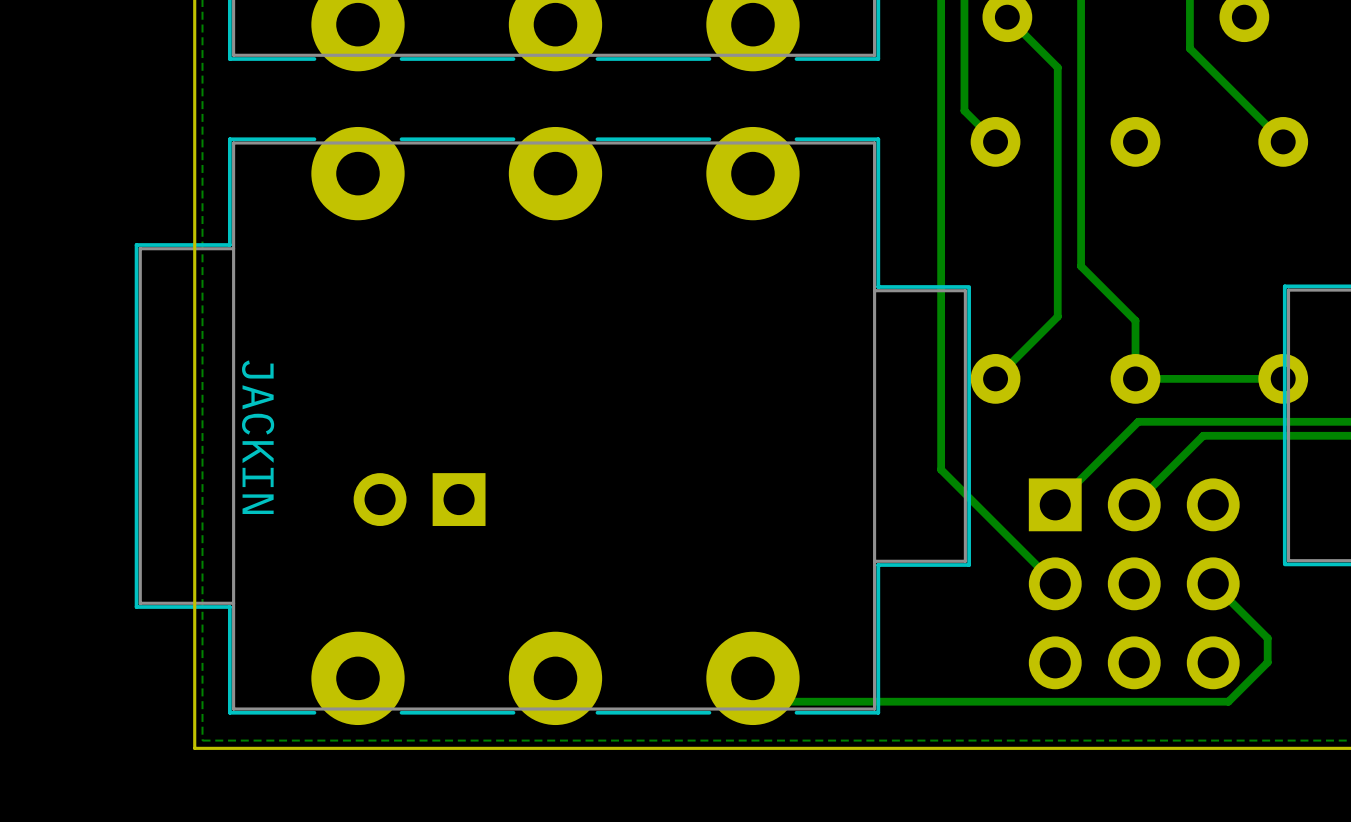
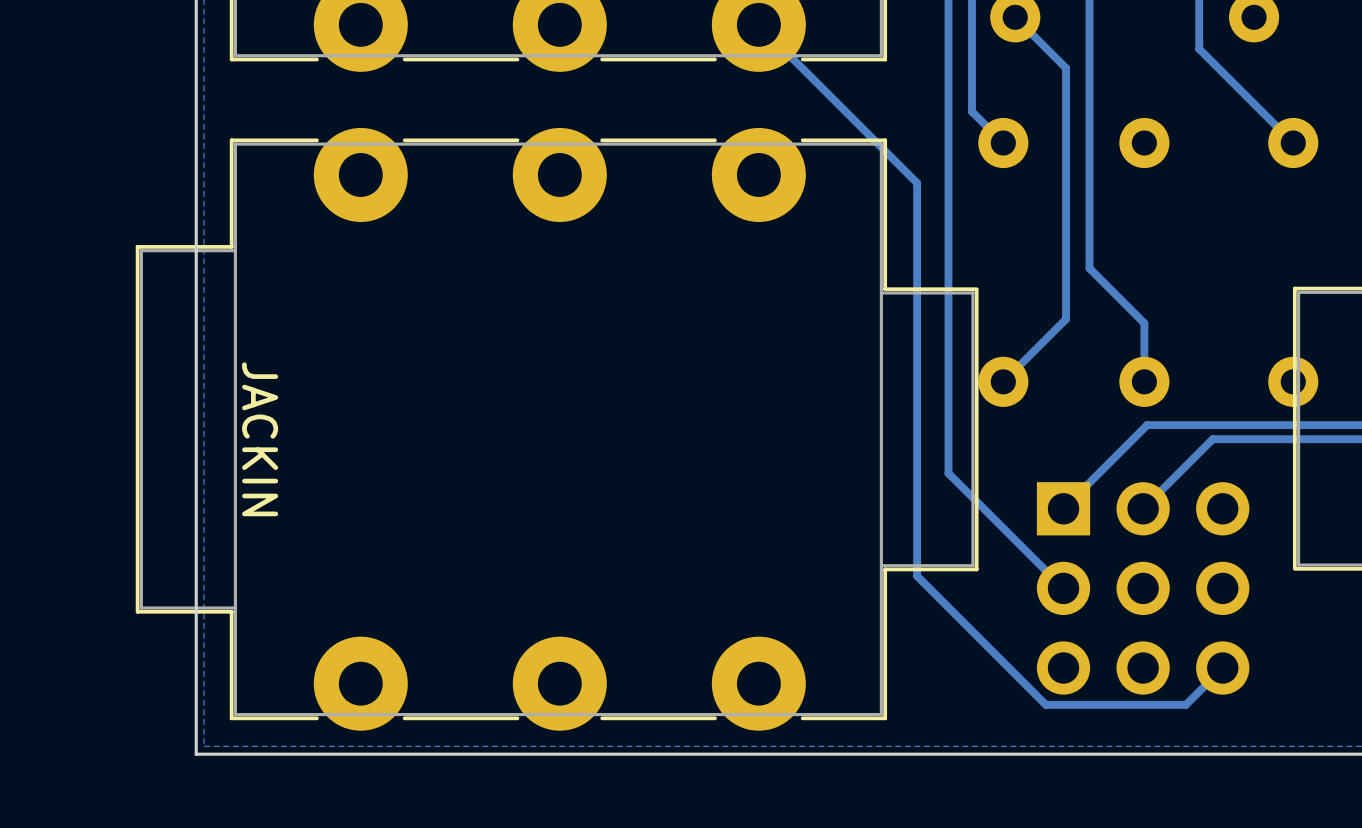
track: none -> (758, 24) (917, 183) (917, 576) (1045, 704) (1185, 704) (1222, 668)
track: (1283, 378) (1135, 378) -> none
part: (419, 499) -> none
track: (1213, 583) (1267, 638) (1267, 662) (1228, 701) (776, 701) (752, 678) -> none

